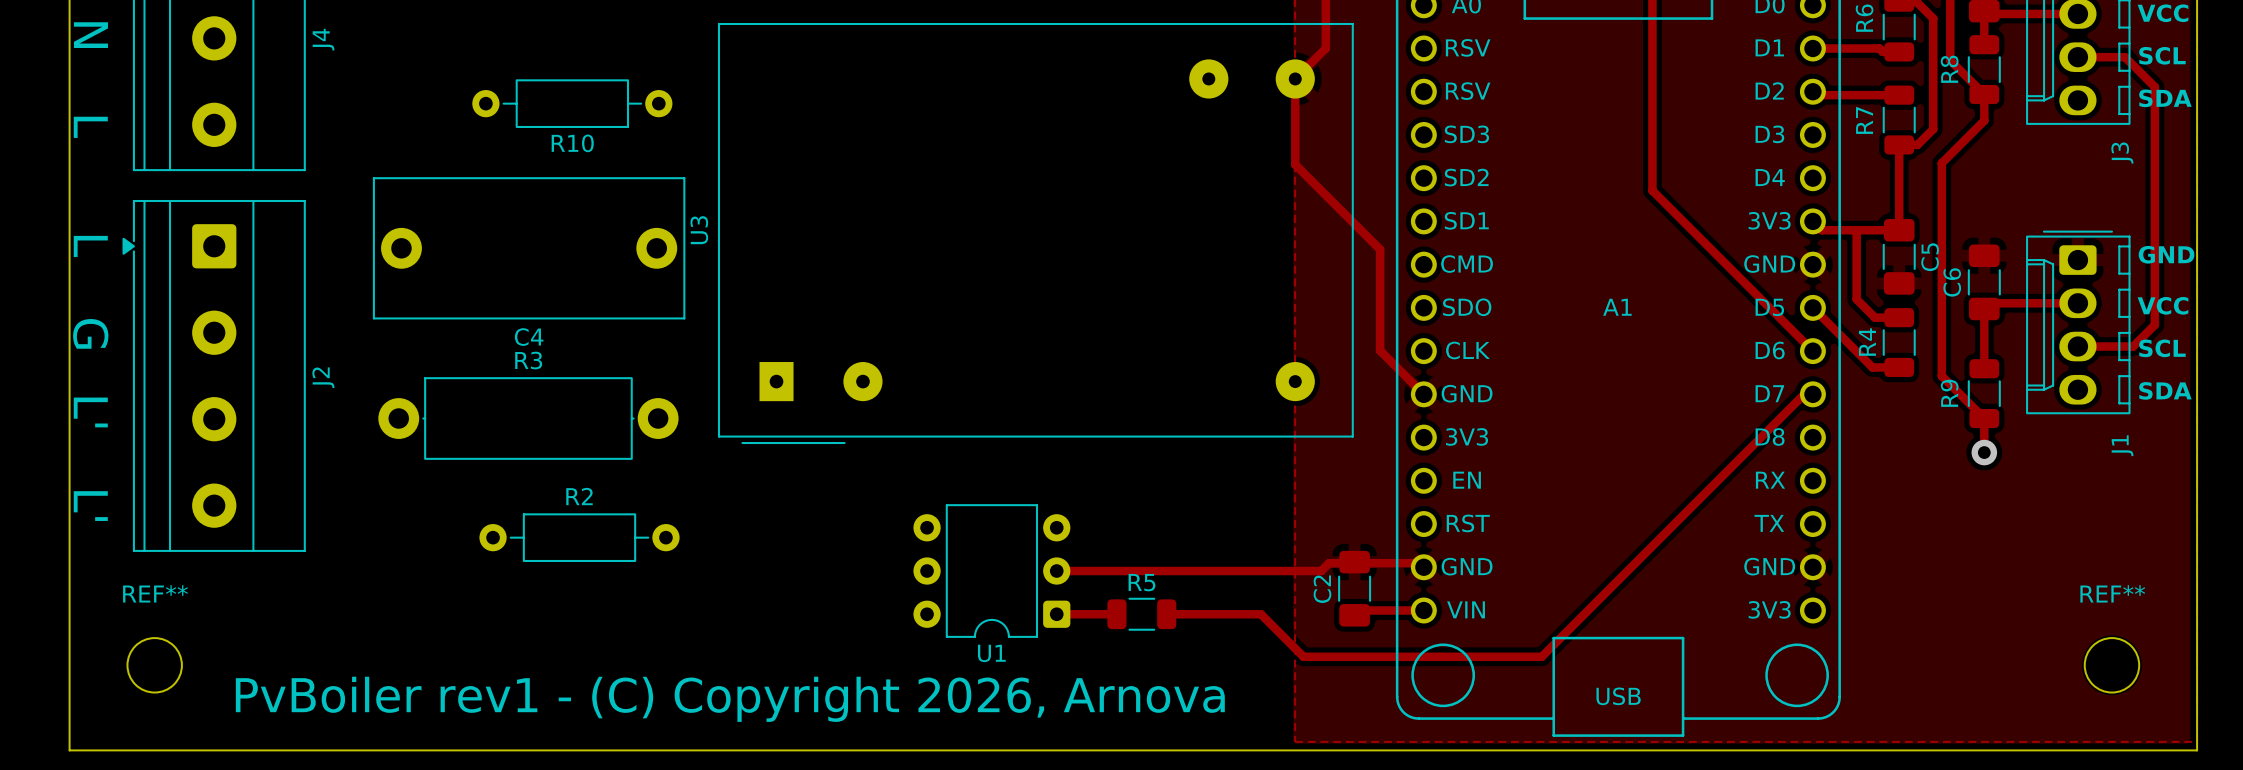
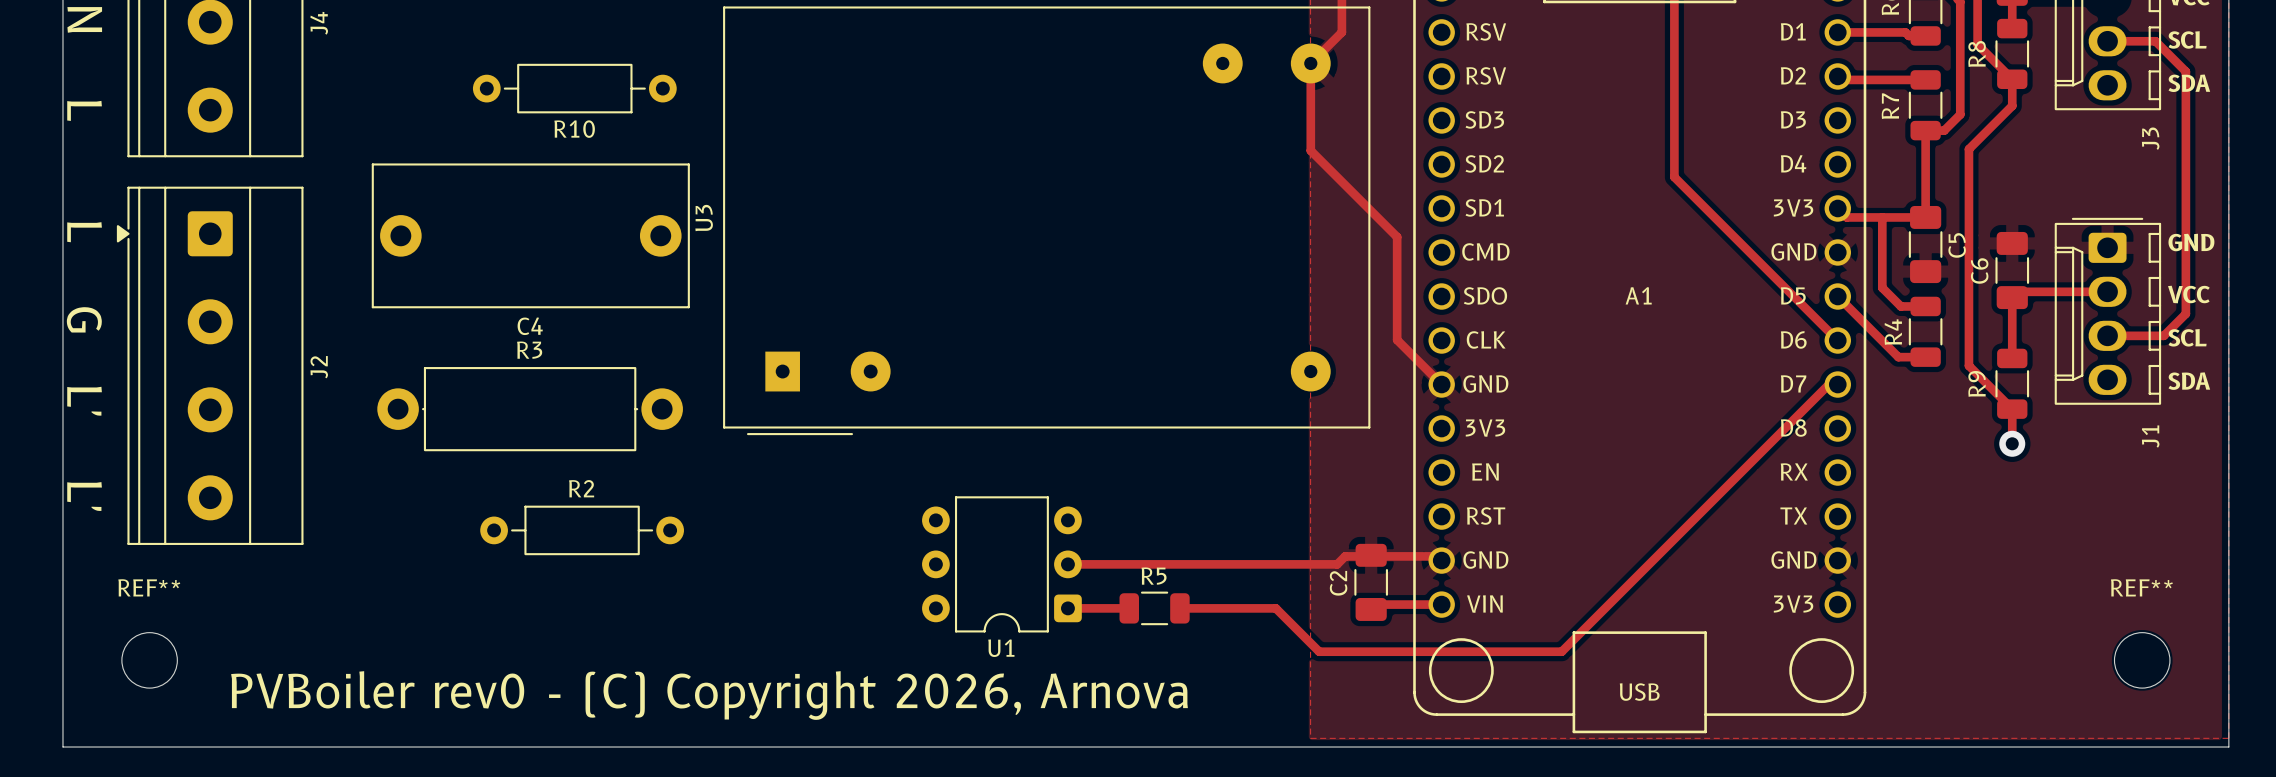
text: PvBoiler rev1 - (C) Copyright 2026, Arnova (730, 699) -> PVBoiler rev0 - (C) Copyright 2026, Arnova (709, 695)

